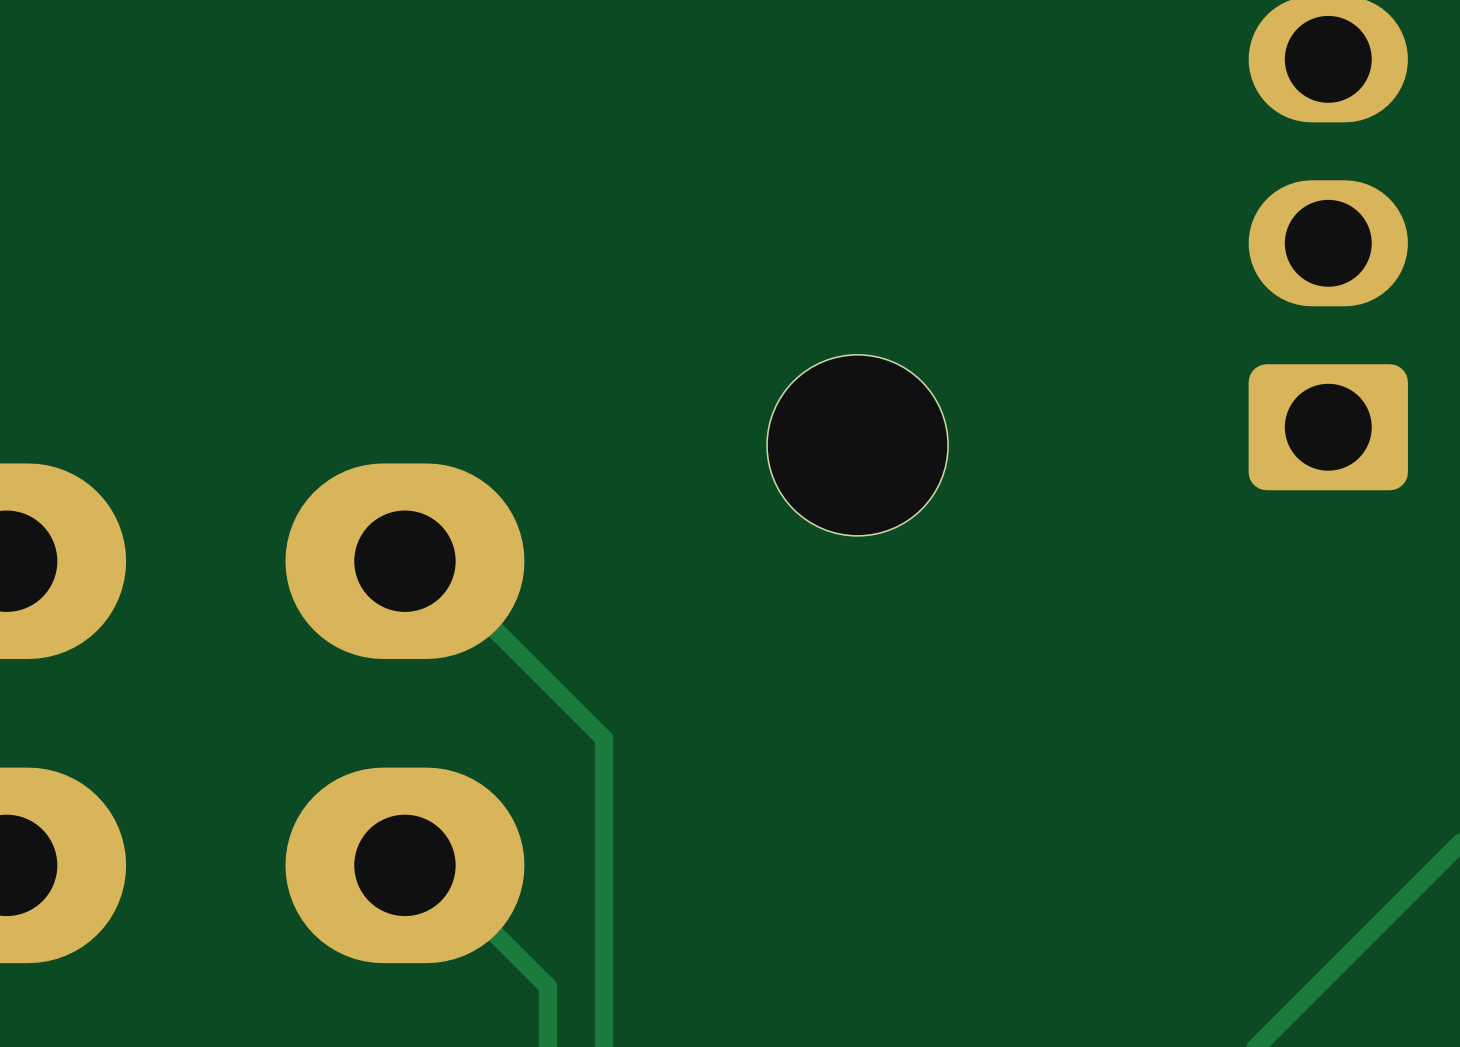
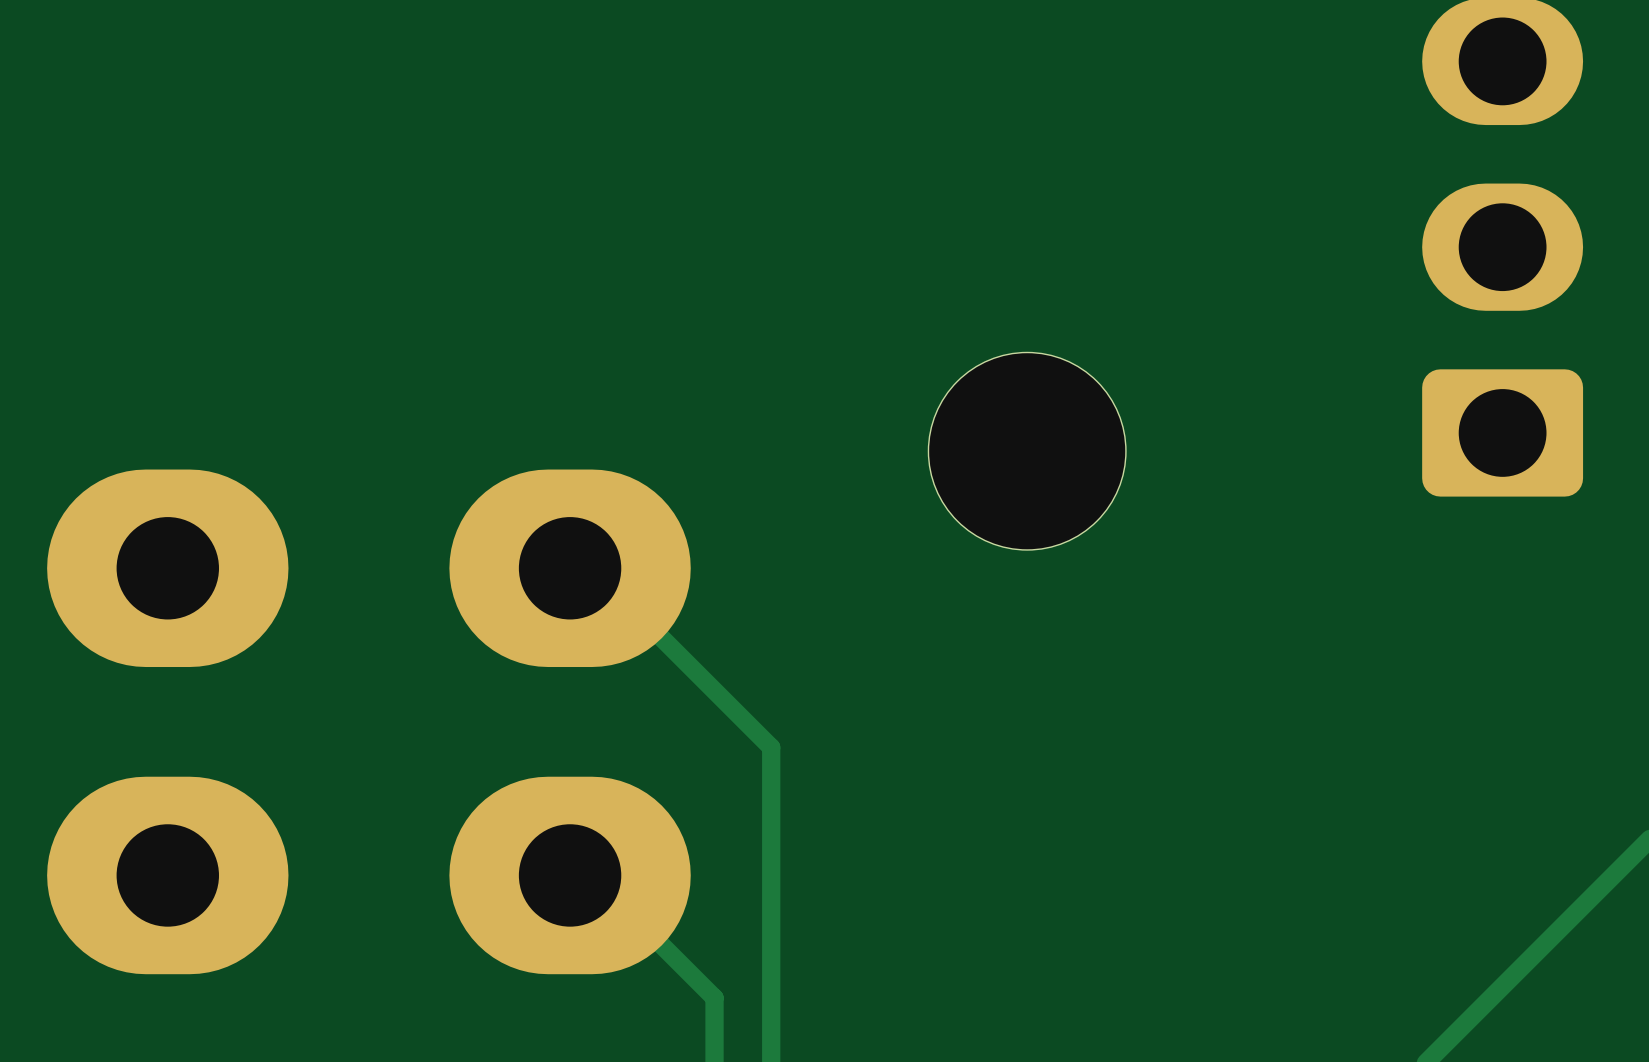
part footprint: [767, 354, 949, 536] -> [928, 352, 1126, 550]

